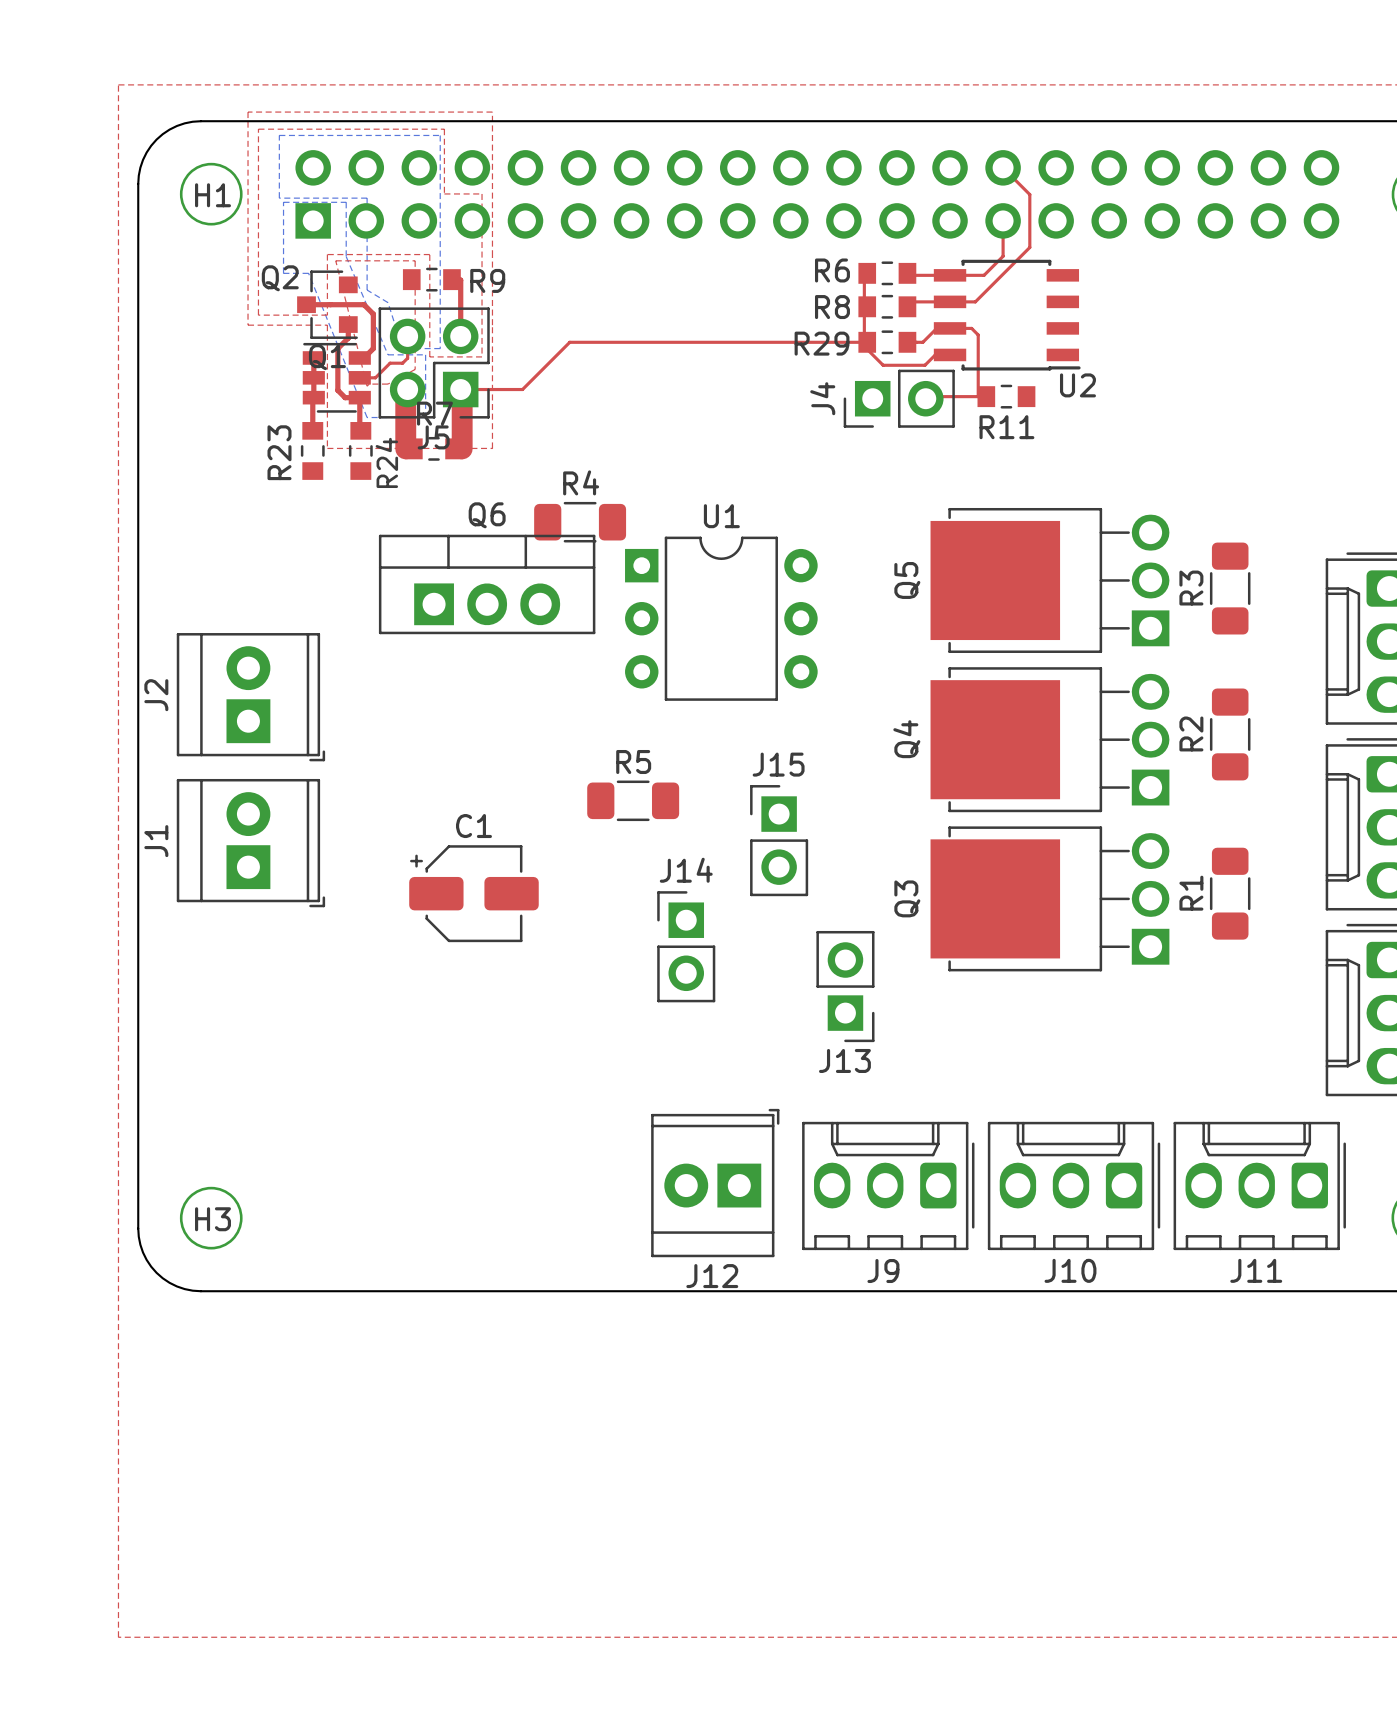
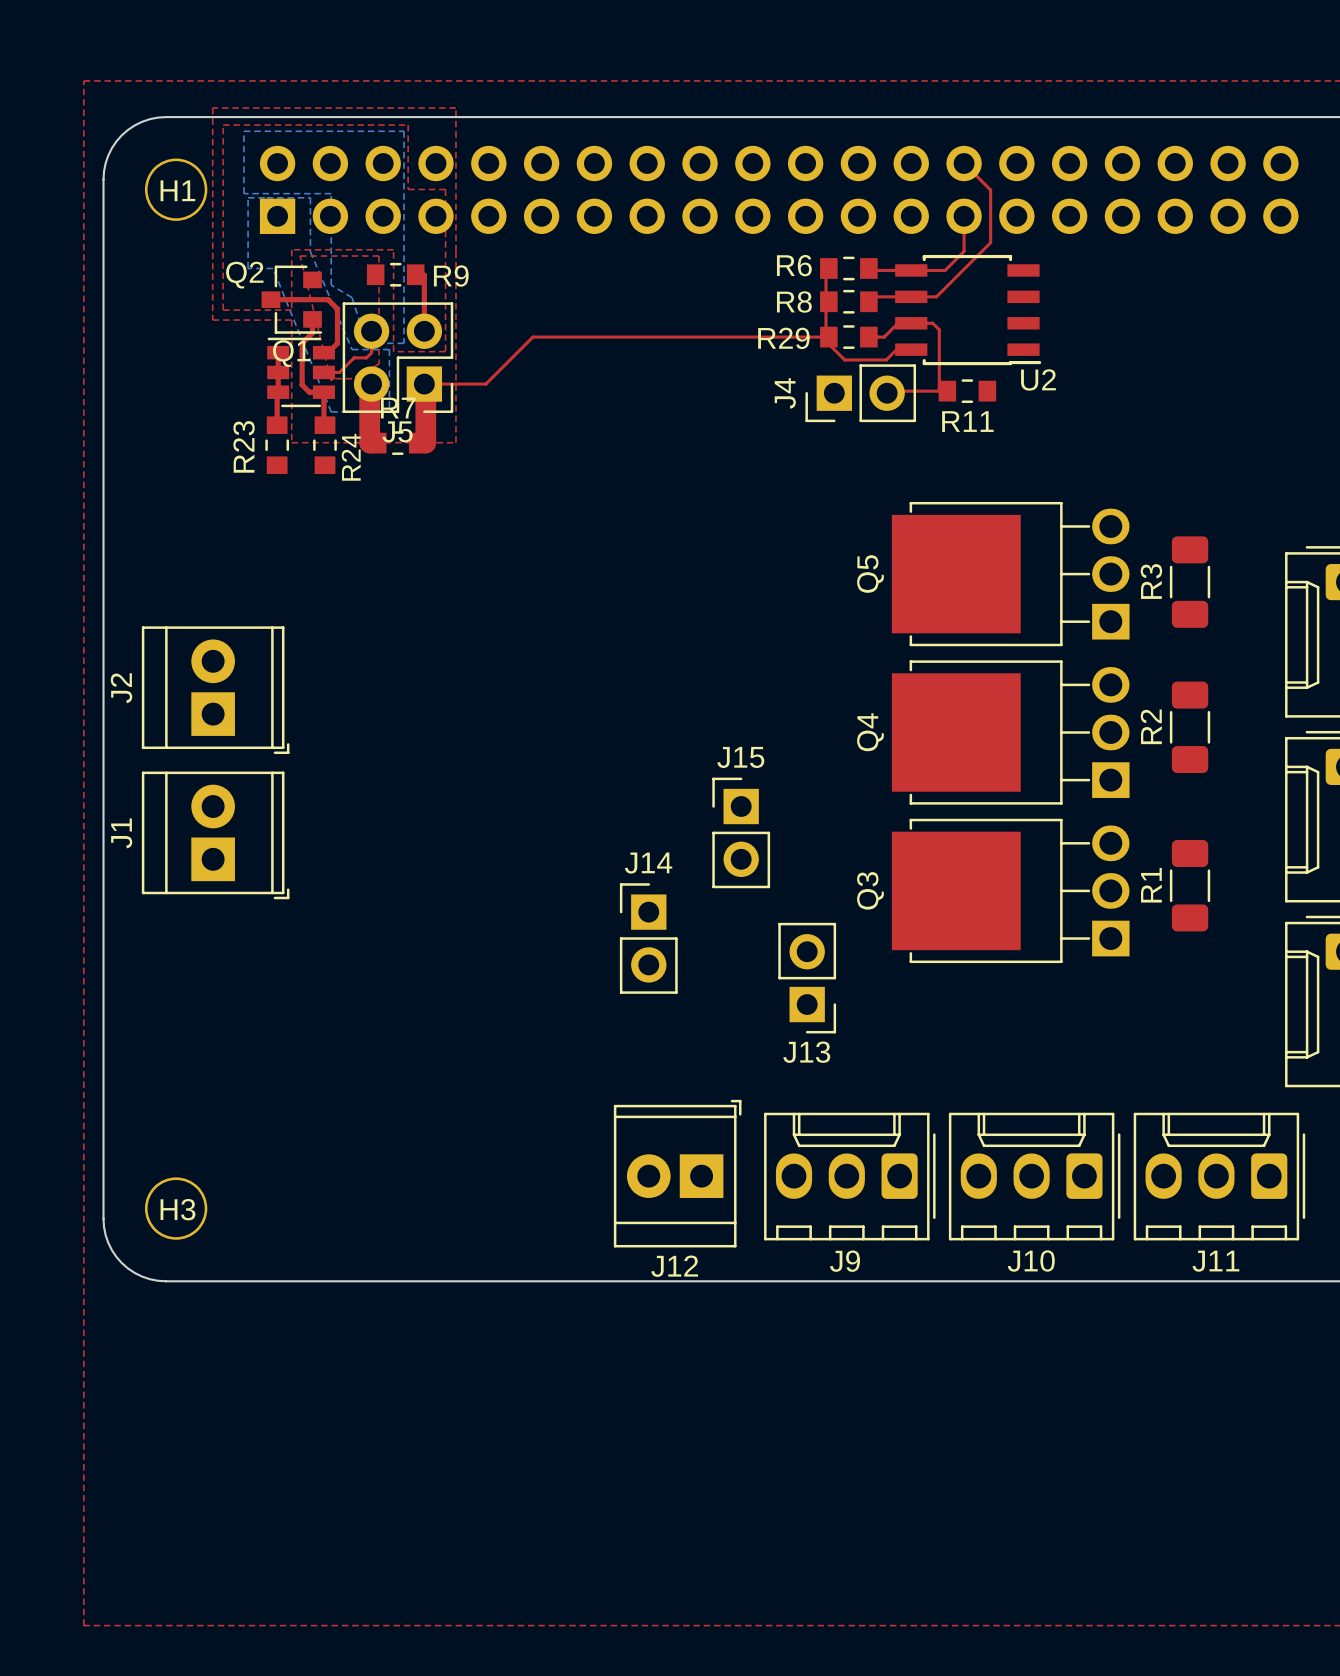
R4: (580, 522) -> none
Q6: (487, 584) -> none
U1: (721, 618) -> none
R5: (633, 800) -> none
C1: (473, 893) -> none

